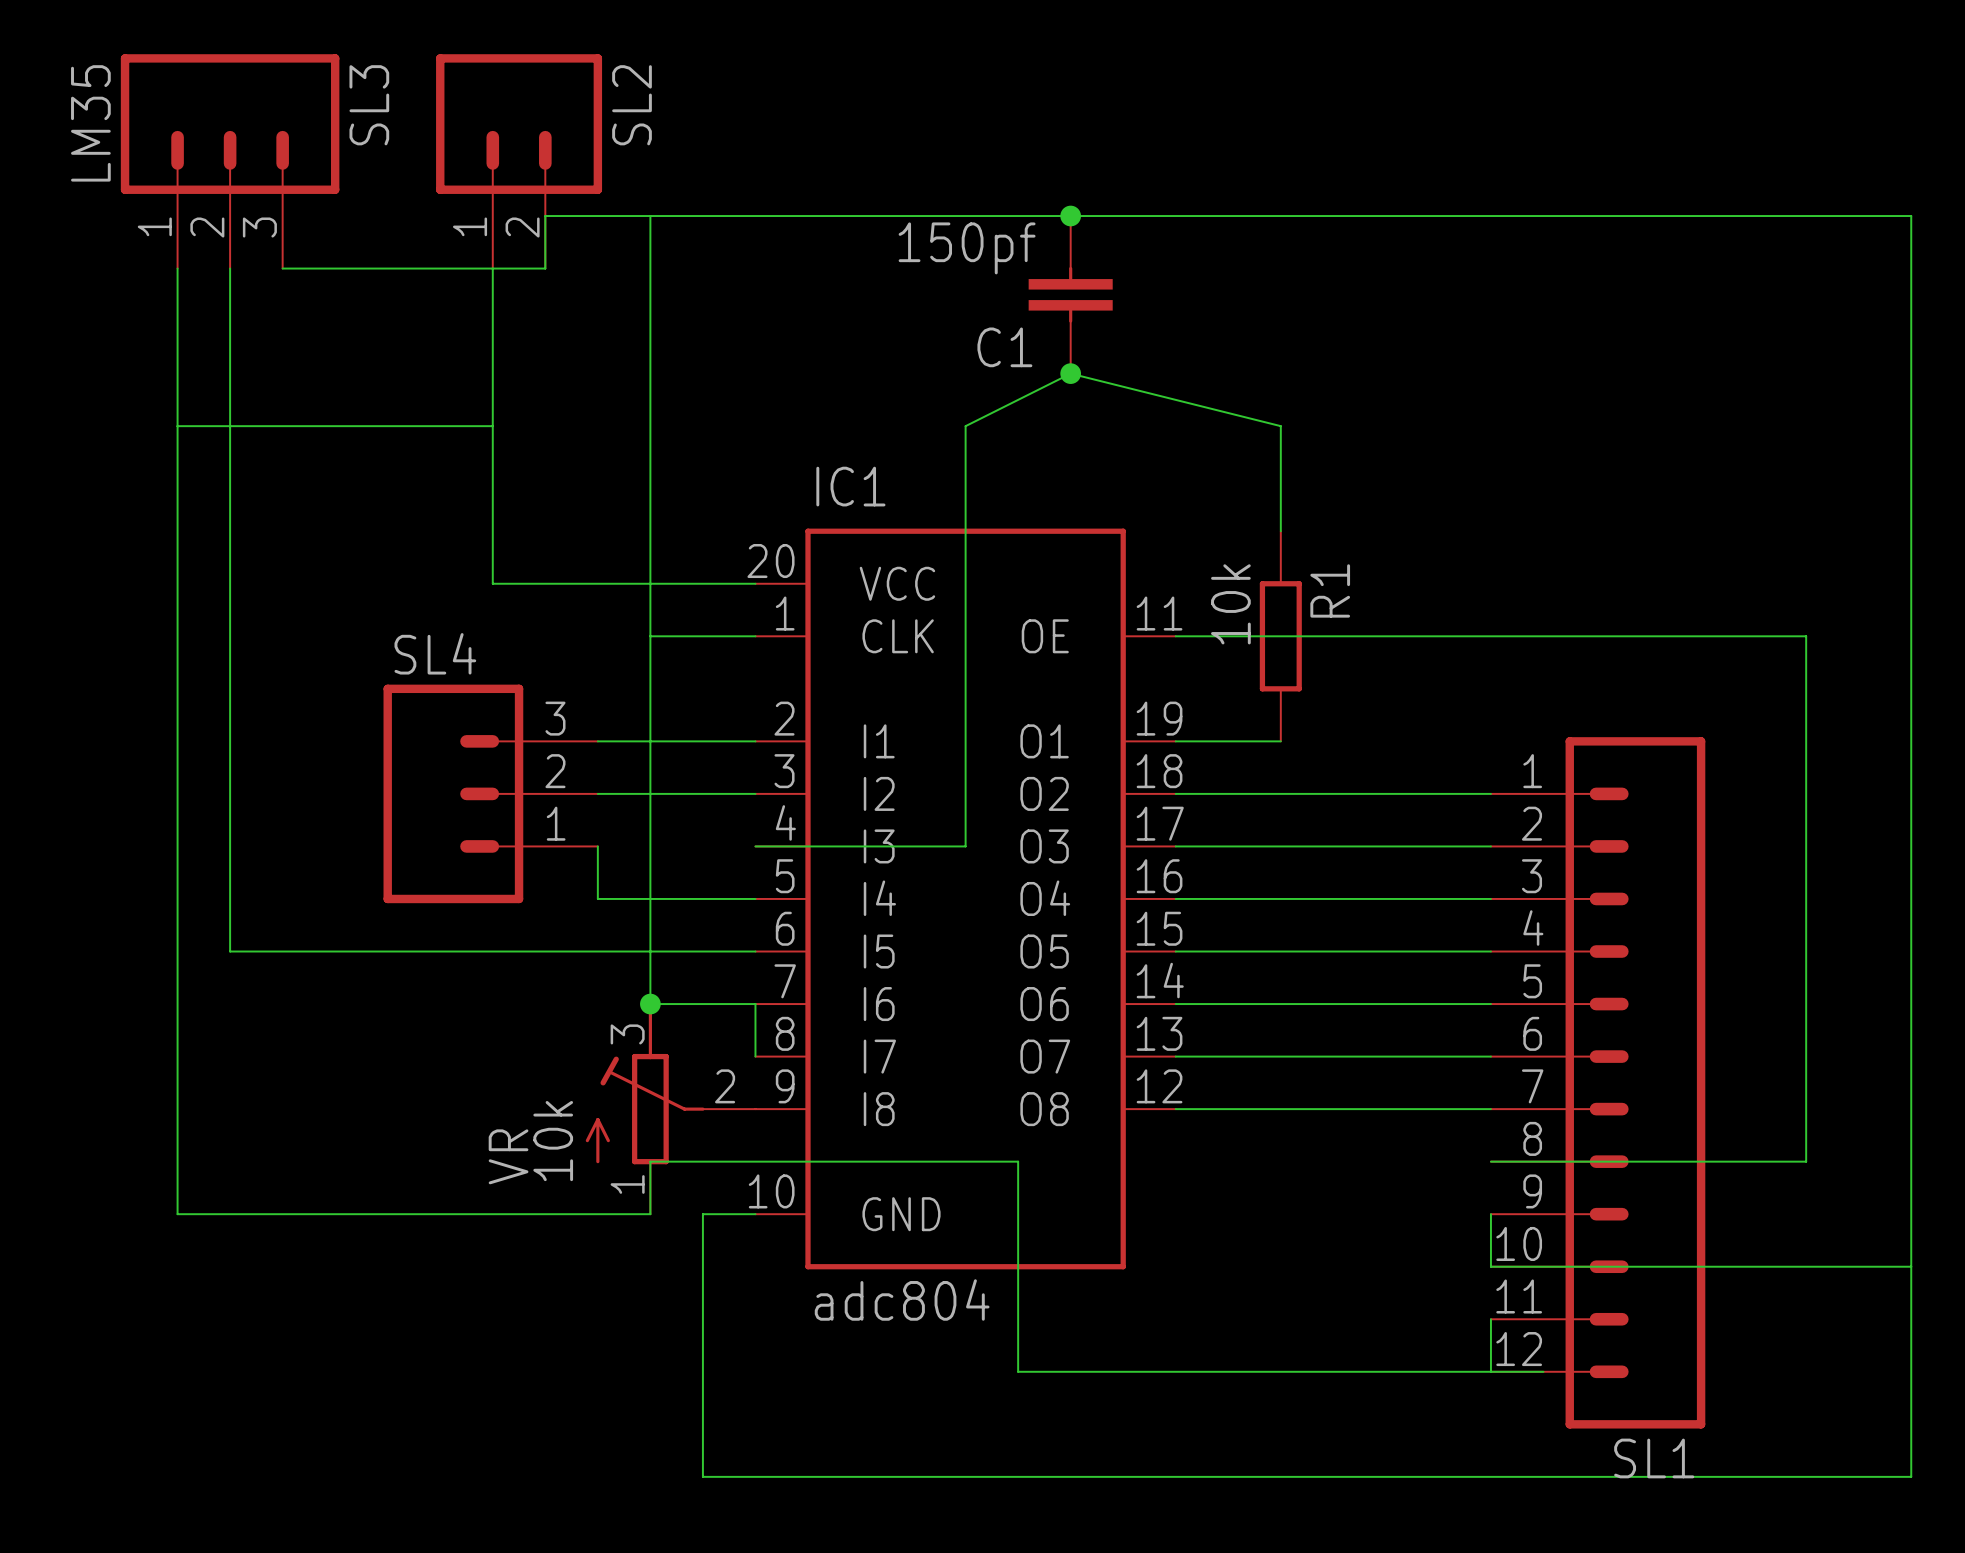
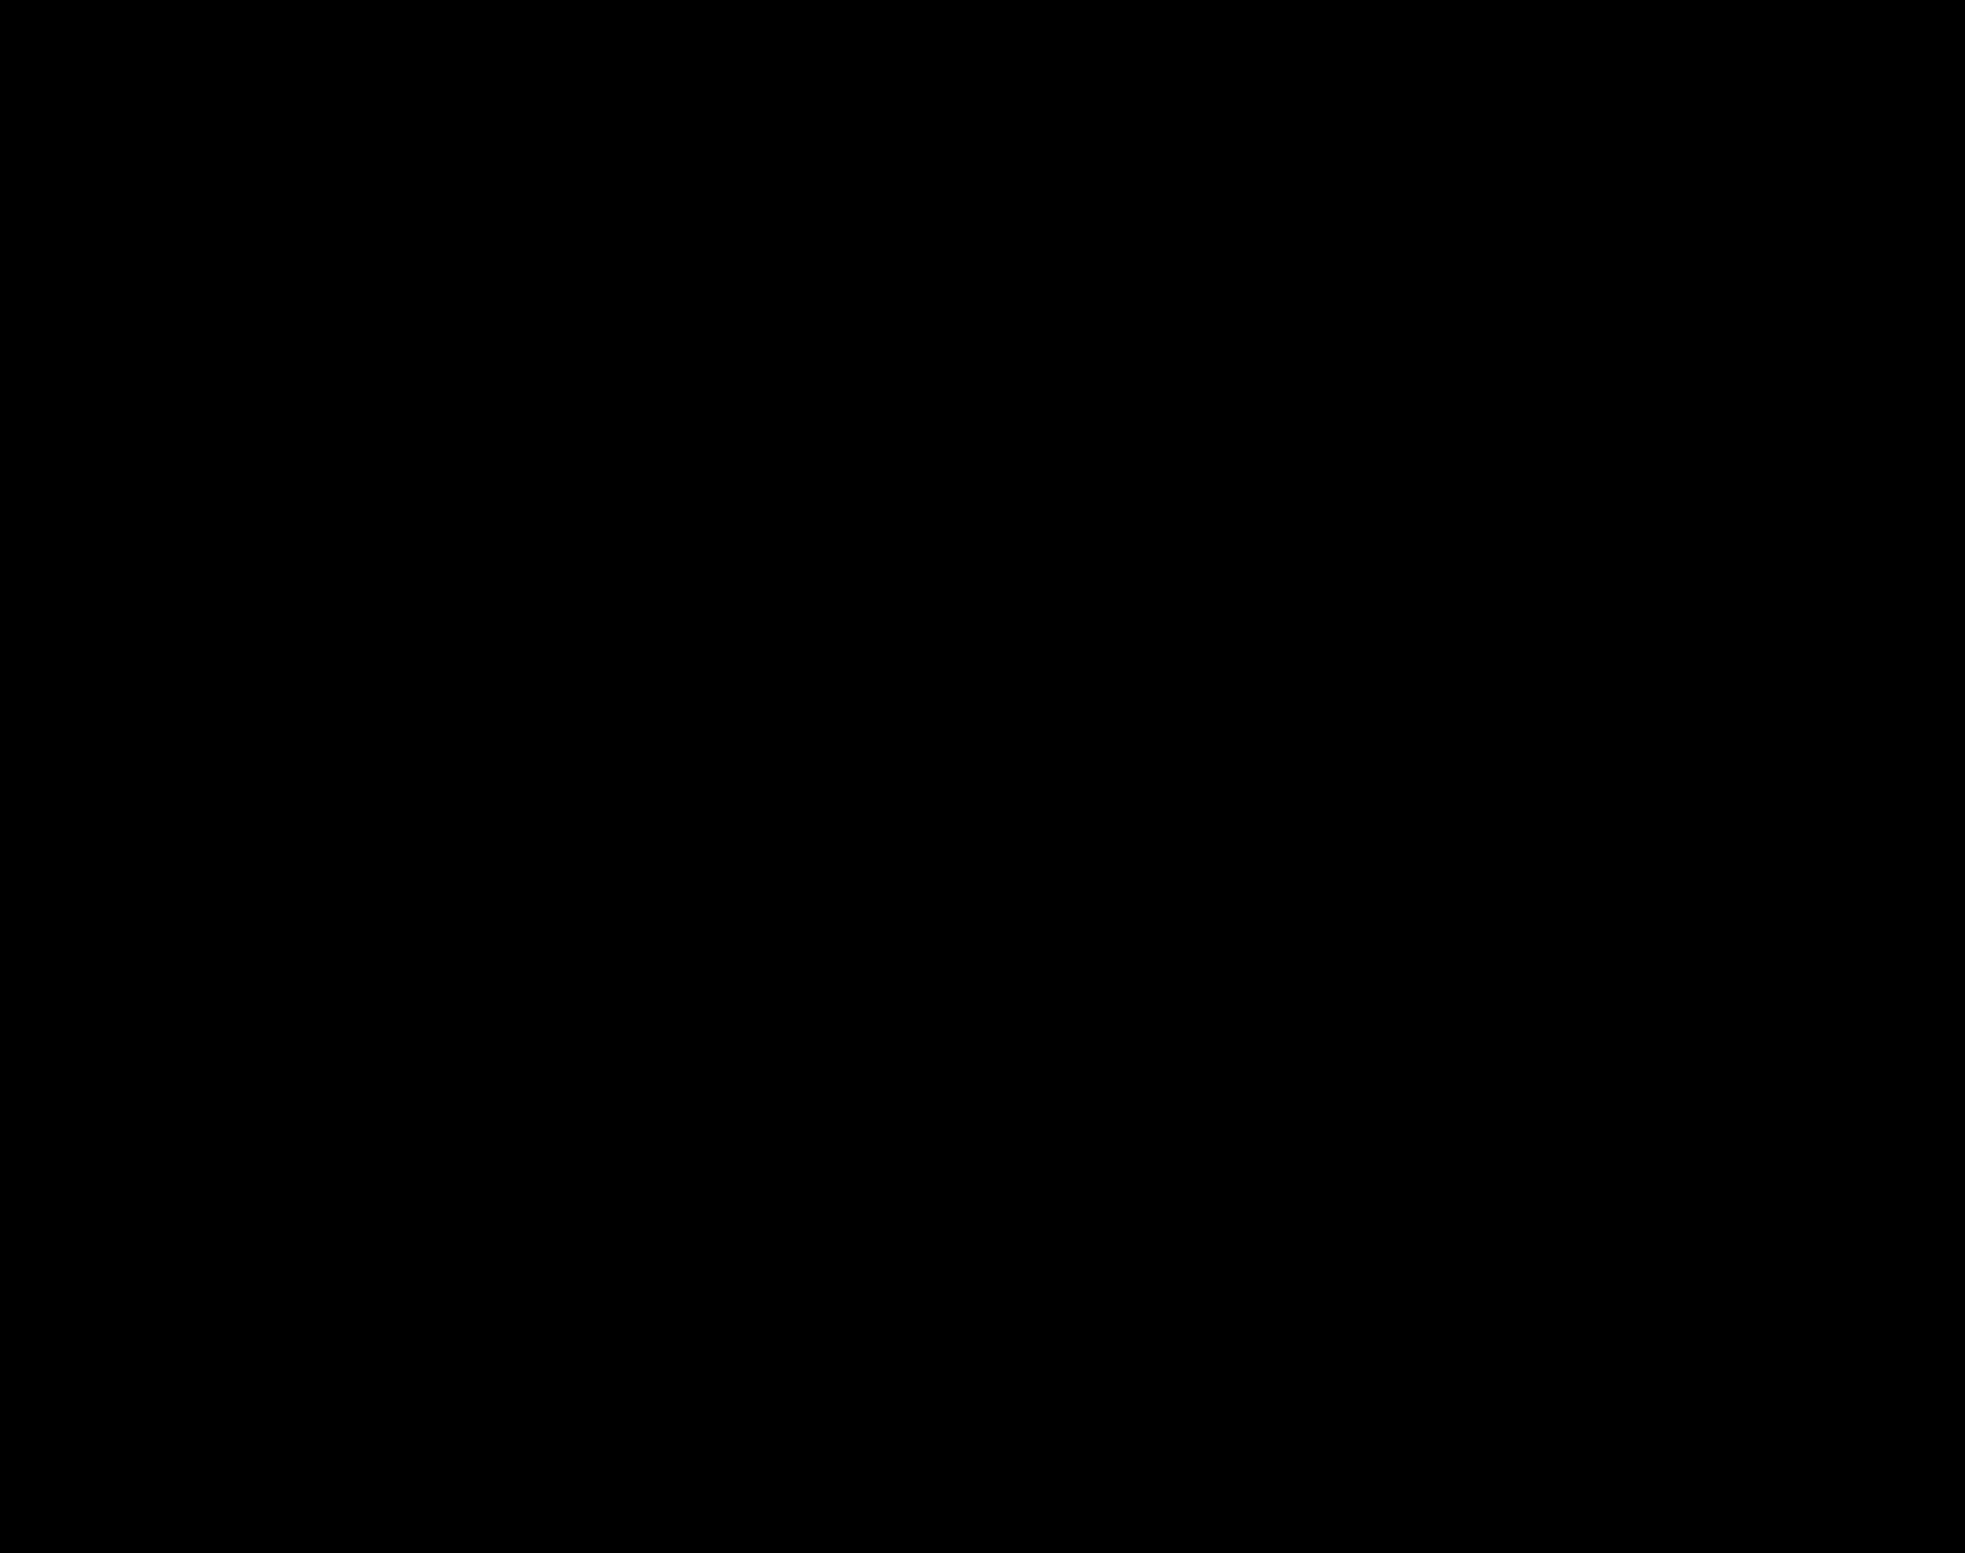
SL3: LM35 (230, 161) -> none
SL2: (519, 161) -> none
wire: (650, 216) (650, 1004) (755, 1004) (755, 1056) -> none
junction: (1070, 216) -> none
wire: (177, 268) (177, 1214) (650, 1214) (650, 1161) (1018, 1161) (1018, 1371) (1543, 1371) -> none
wire: (230, 268) (230, 951) (755, 951) -> none
wire: (282, 268) (545, 268) (545, 216) (1911, 216) (1911, 1476) (702, 1476) (702, 1214) (755, 1214) -> none
wire: (492, 268) (492, 583) (755, 583) -> none
C1: 150pf (1070, 294) -> none
junction: (1070, 373) -> none
wire: (177, 426) (492, 426) -> none
wire: (1280, 531) (1280, 426) (1070, 373) (965, 426) (965, 846) (755, 846) -> none
wire: (650, 636) (755, 636) -> none
wire: (1175, 636) (1806, 636) (1806, 1161) (1490, 1161) -> none
R1: 10k (1280, 636) -> none
wire: (597, 741) (755, 741) -> none
wire: (1175, 741) (1280, 741) -> none
SL4: (490, 793) -> none
wire: (597, 793) (755, 793) -> none
wire: (1175, 793) (1490, 793) -> none
wire: (597, 846) (597, 898) (755, 898) -> none
wire: (1175, 846) (1490, 846) -> none
IC1: adc804 (965, 898) -> none
wire: (1175, 898) (1490, 898) -> none
wire: (1175, 951) (1490, 951) -> none
junction: (650, 1004) -> none
wire: (1175, 1004) (1490, 1004) -> none
wire: (1175, 1056) (1490, 1056) -> none
SL1: (1598, 1082) -> none
VR: 10k (670, 1108) -> none
wire: (1175, 1109) (1490, 1109) -> none
wire: (1490, 1214) (1490, 1266) (1911, 1266) -> none
wire: (1490, 1319) (1490, 1371) -> none

